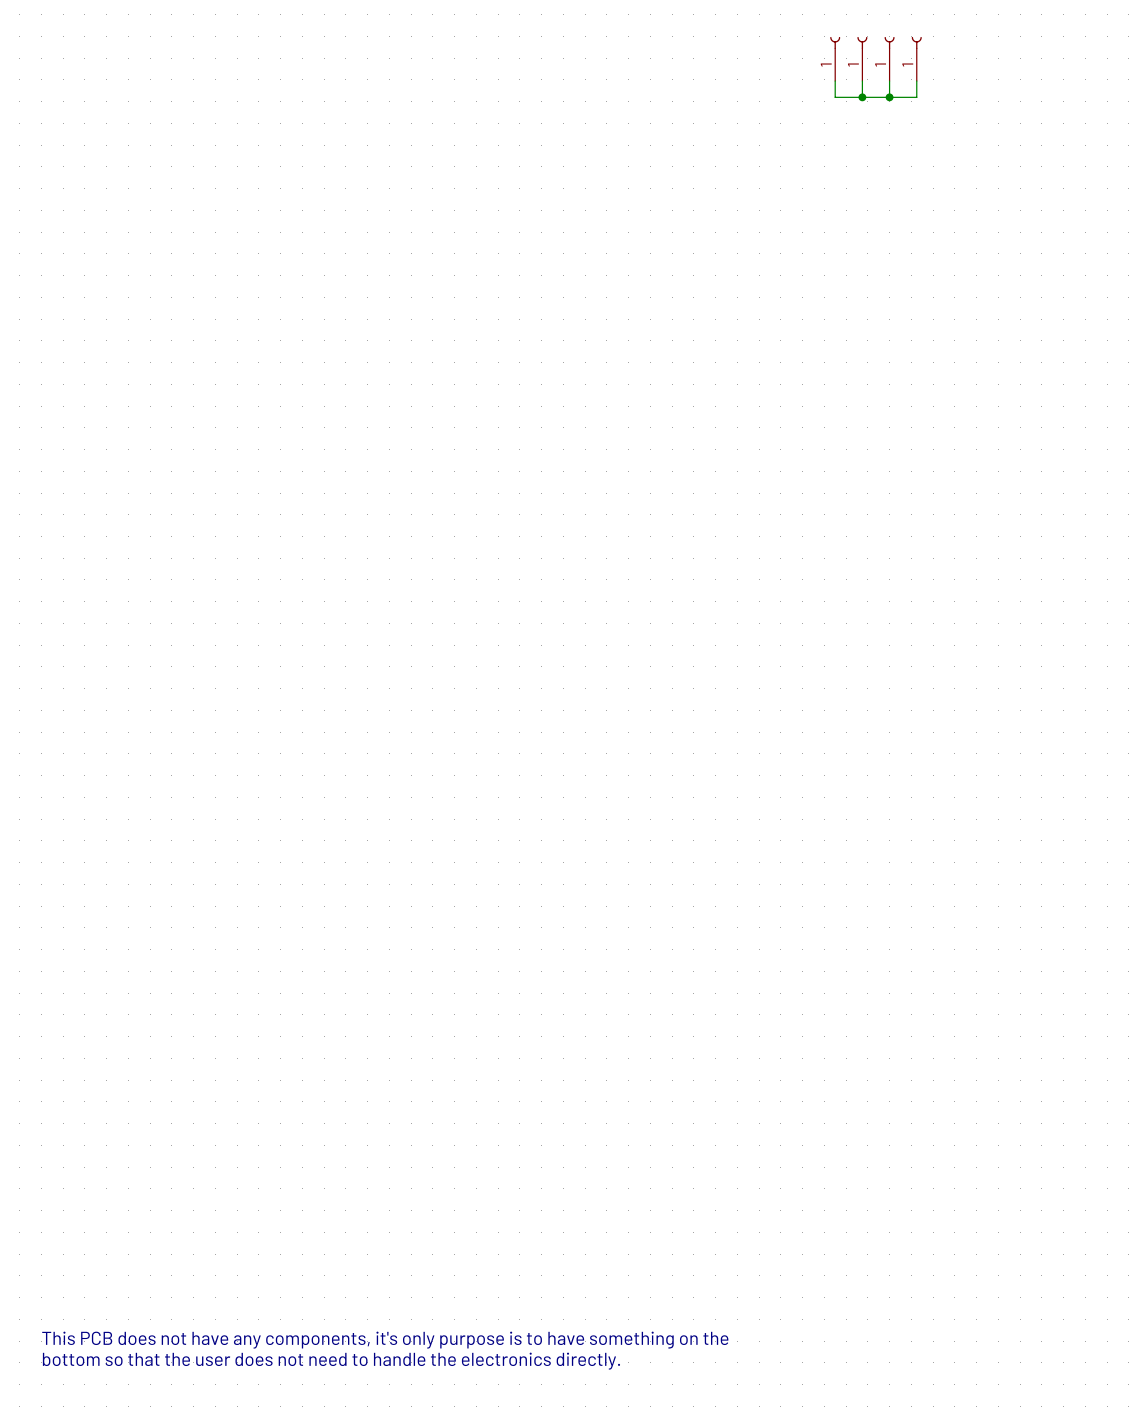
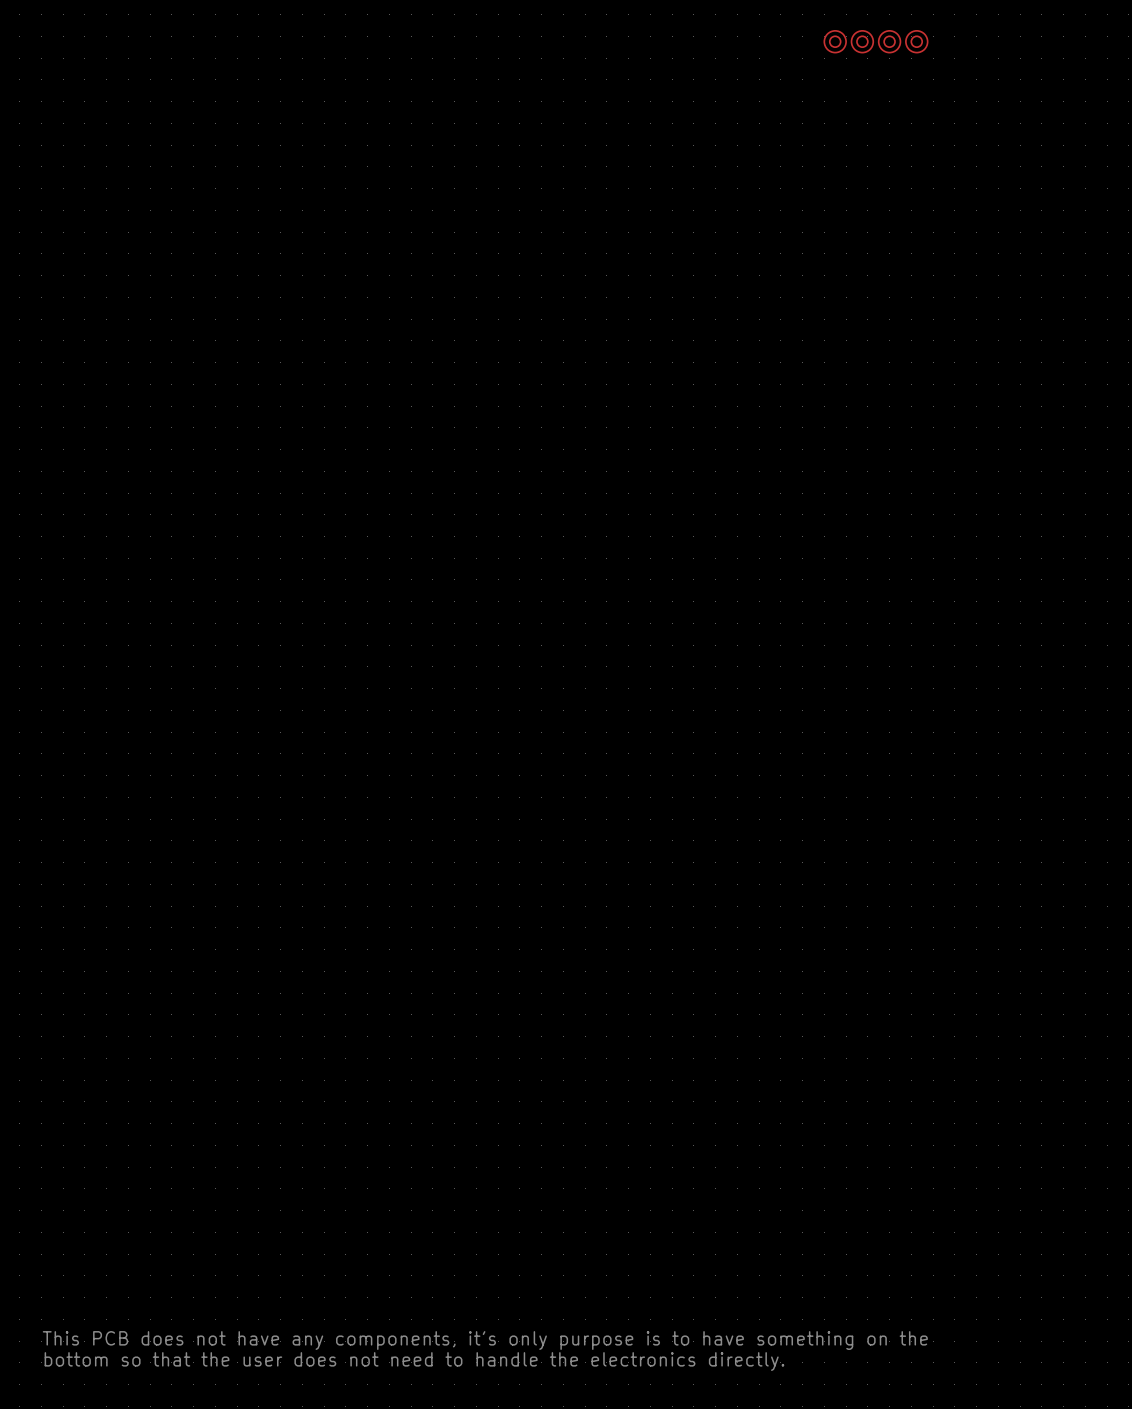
part: none -> (835, 41)
part: none -> (862, 41)
part: none -> (889, 41)
part: none -> (916, 41)
part: (835, 58) -> none
part: (862, 58) -> none
part: (889, 58) -> none
part: (916, 58) -> none
wire: (835, 81) (835, 97) (916, 97) (916, 81) -> none
wire: (862, 81) (862, 97) -> none
wire: (889, 81) (889, 97) -> none
junction: (862, 97) -> none
junction: (889, 97) -> none

